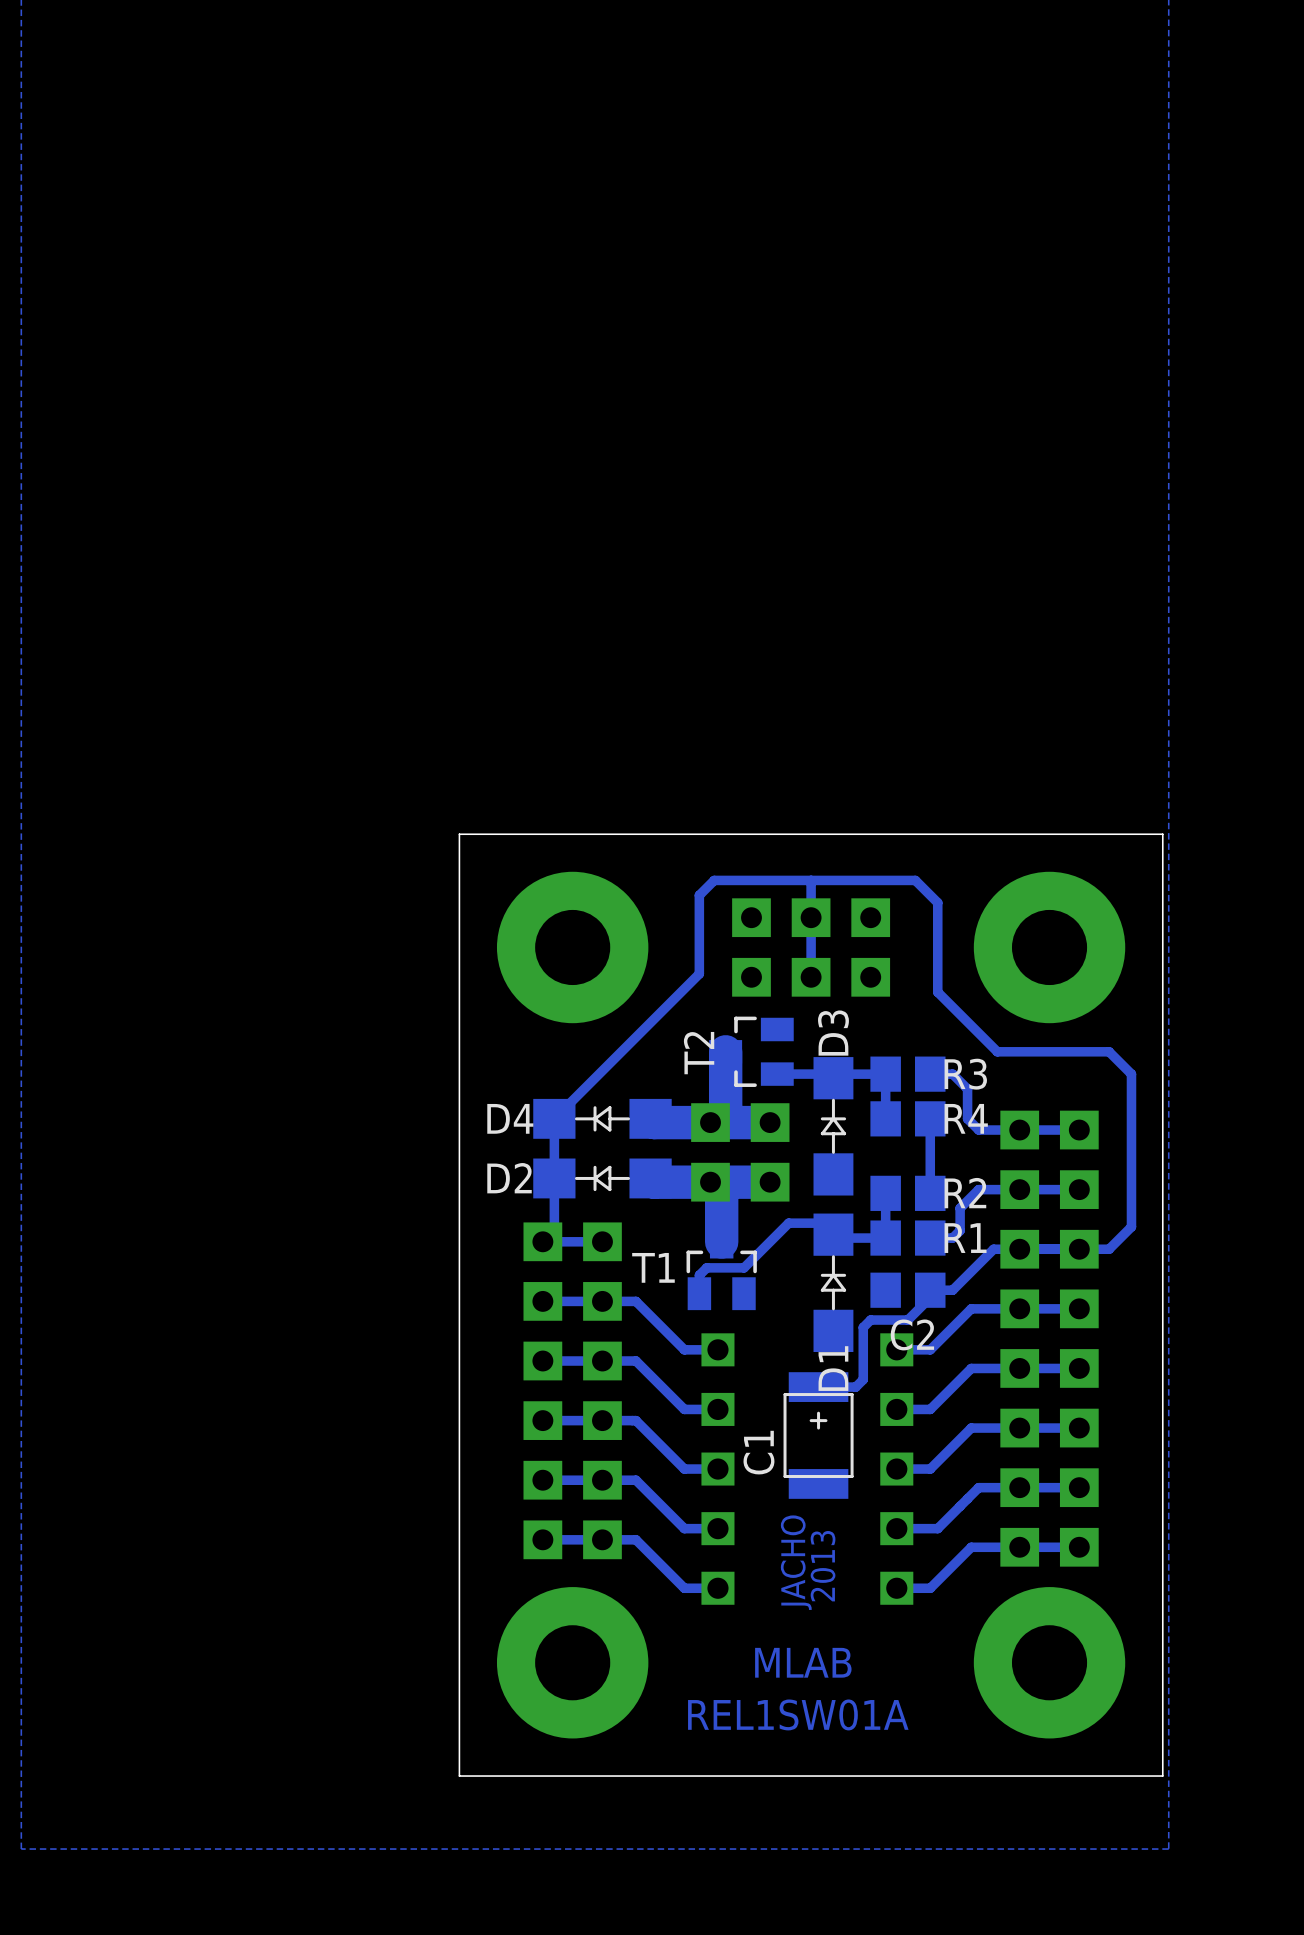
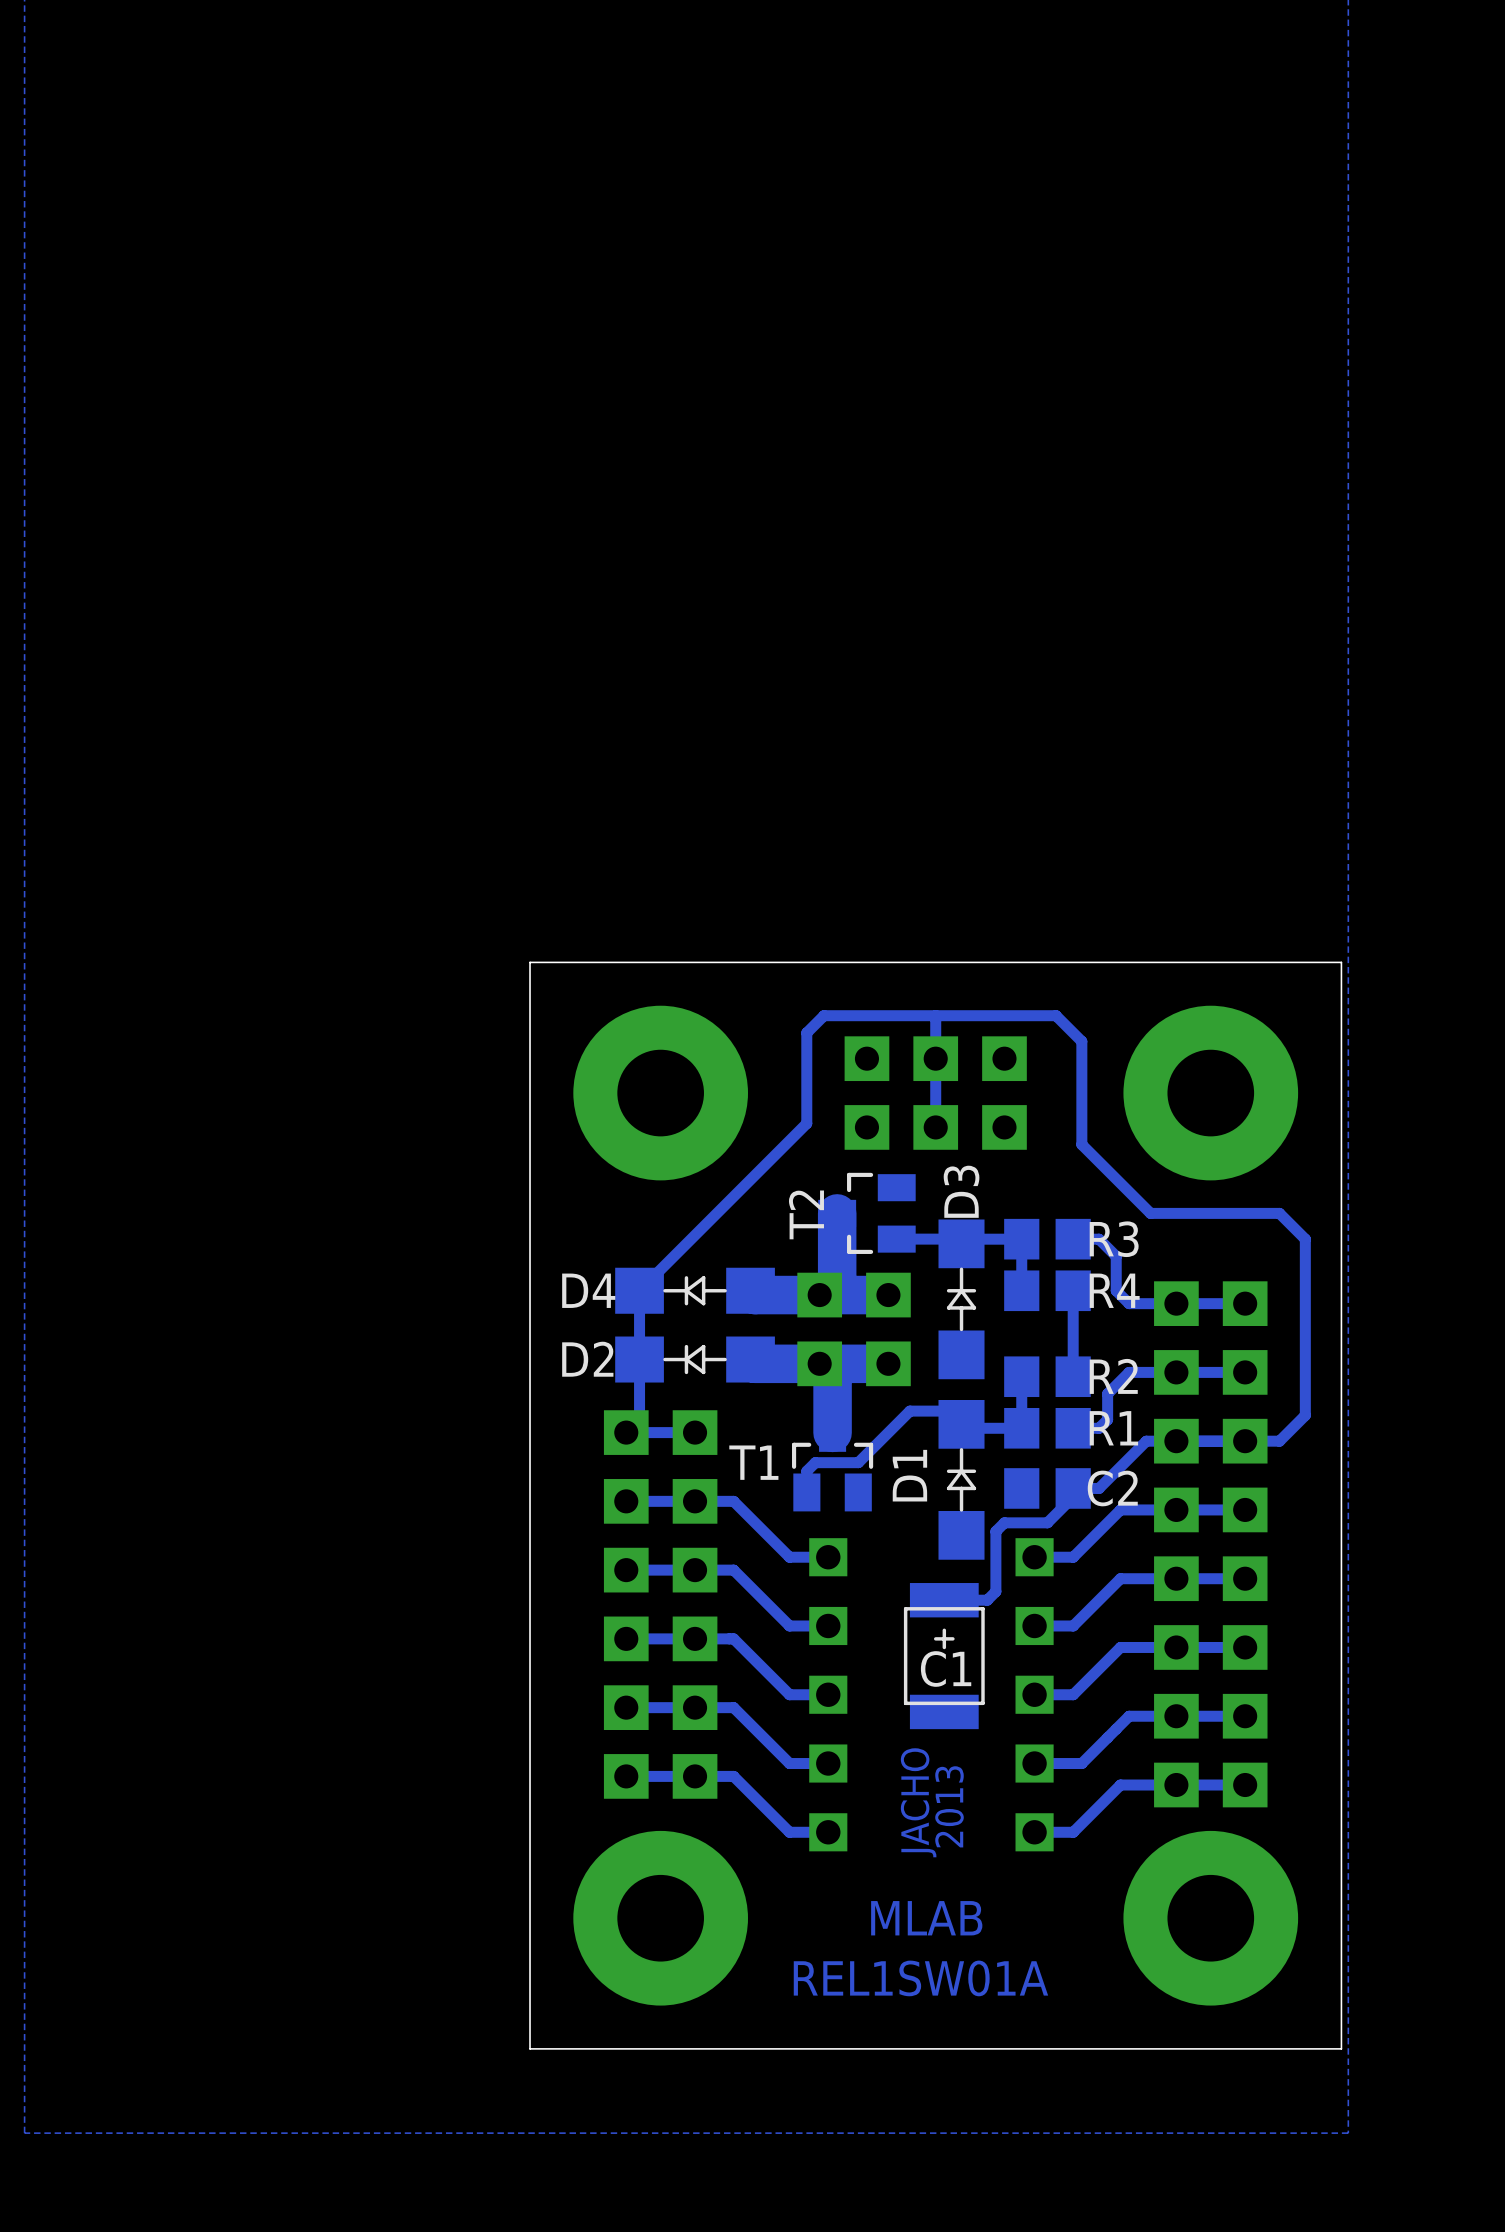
C2 name position: C2 (912, 1334) -> C2 (1112, 1488)
D1 name position: D1 (833, 1368) -> D1 (909, 1475)
C1 name rotation: 0° (758, 1452) -> 90° clockwise (946, 1668)
C1 name position: C1 (758, 1452) -> C1 (946, 1668)

